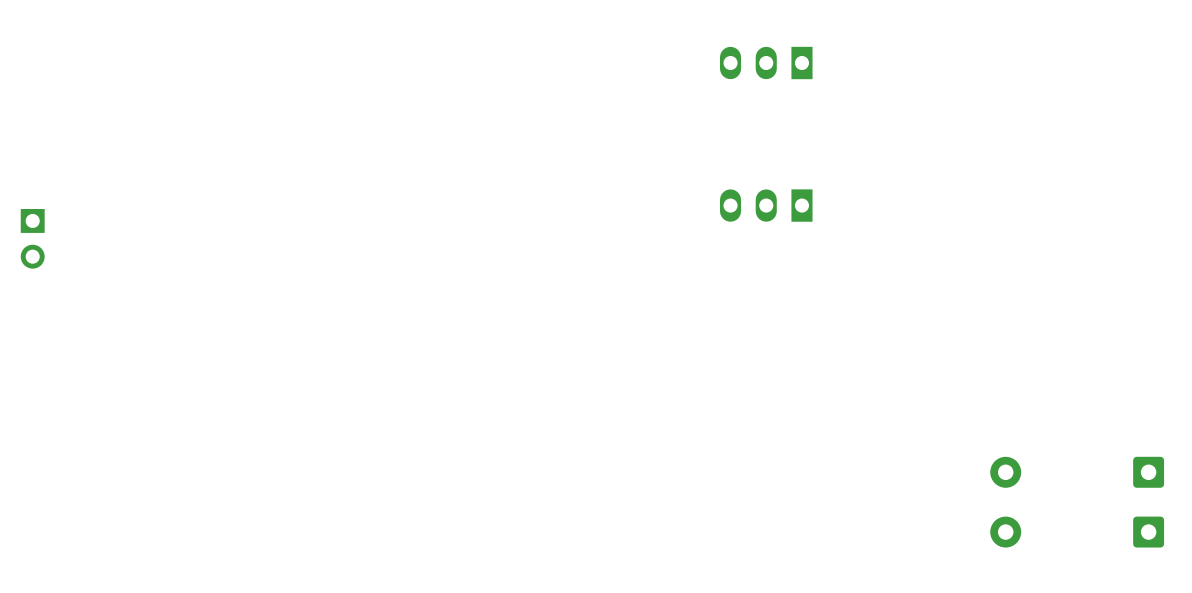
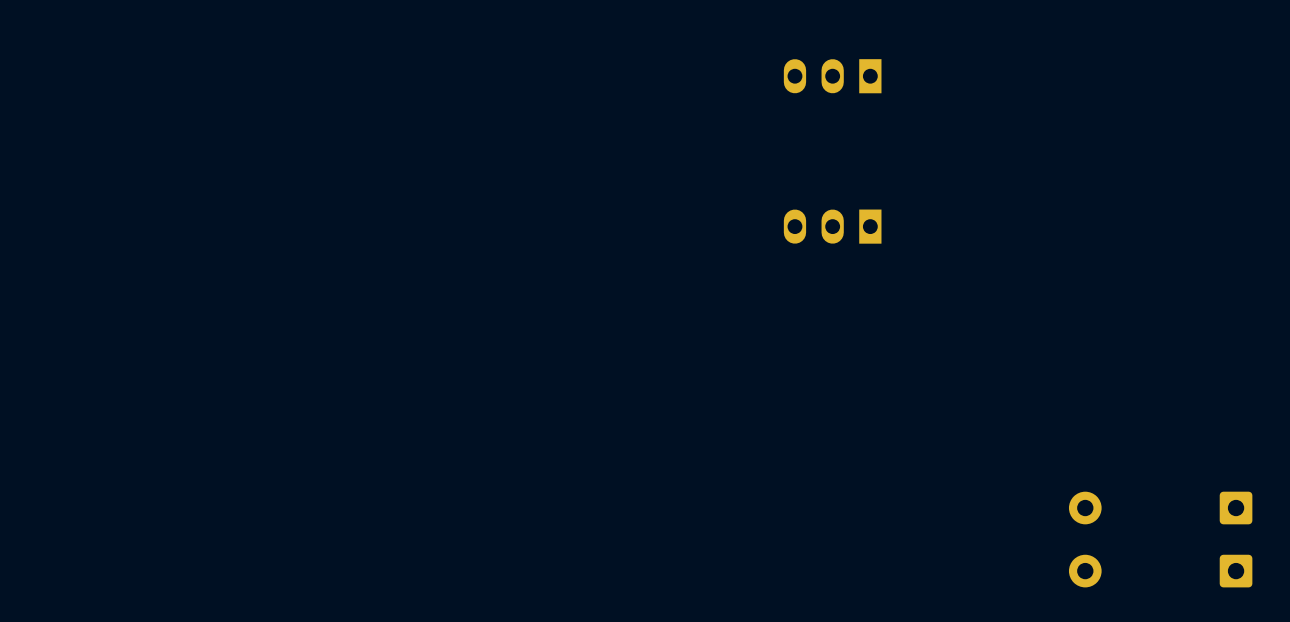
part: (32, 238) -> none

